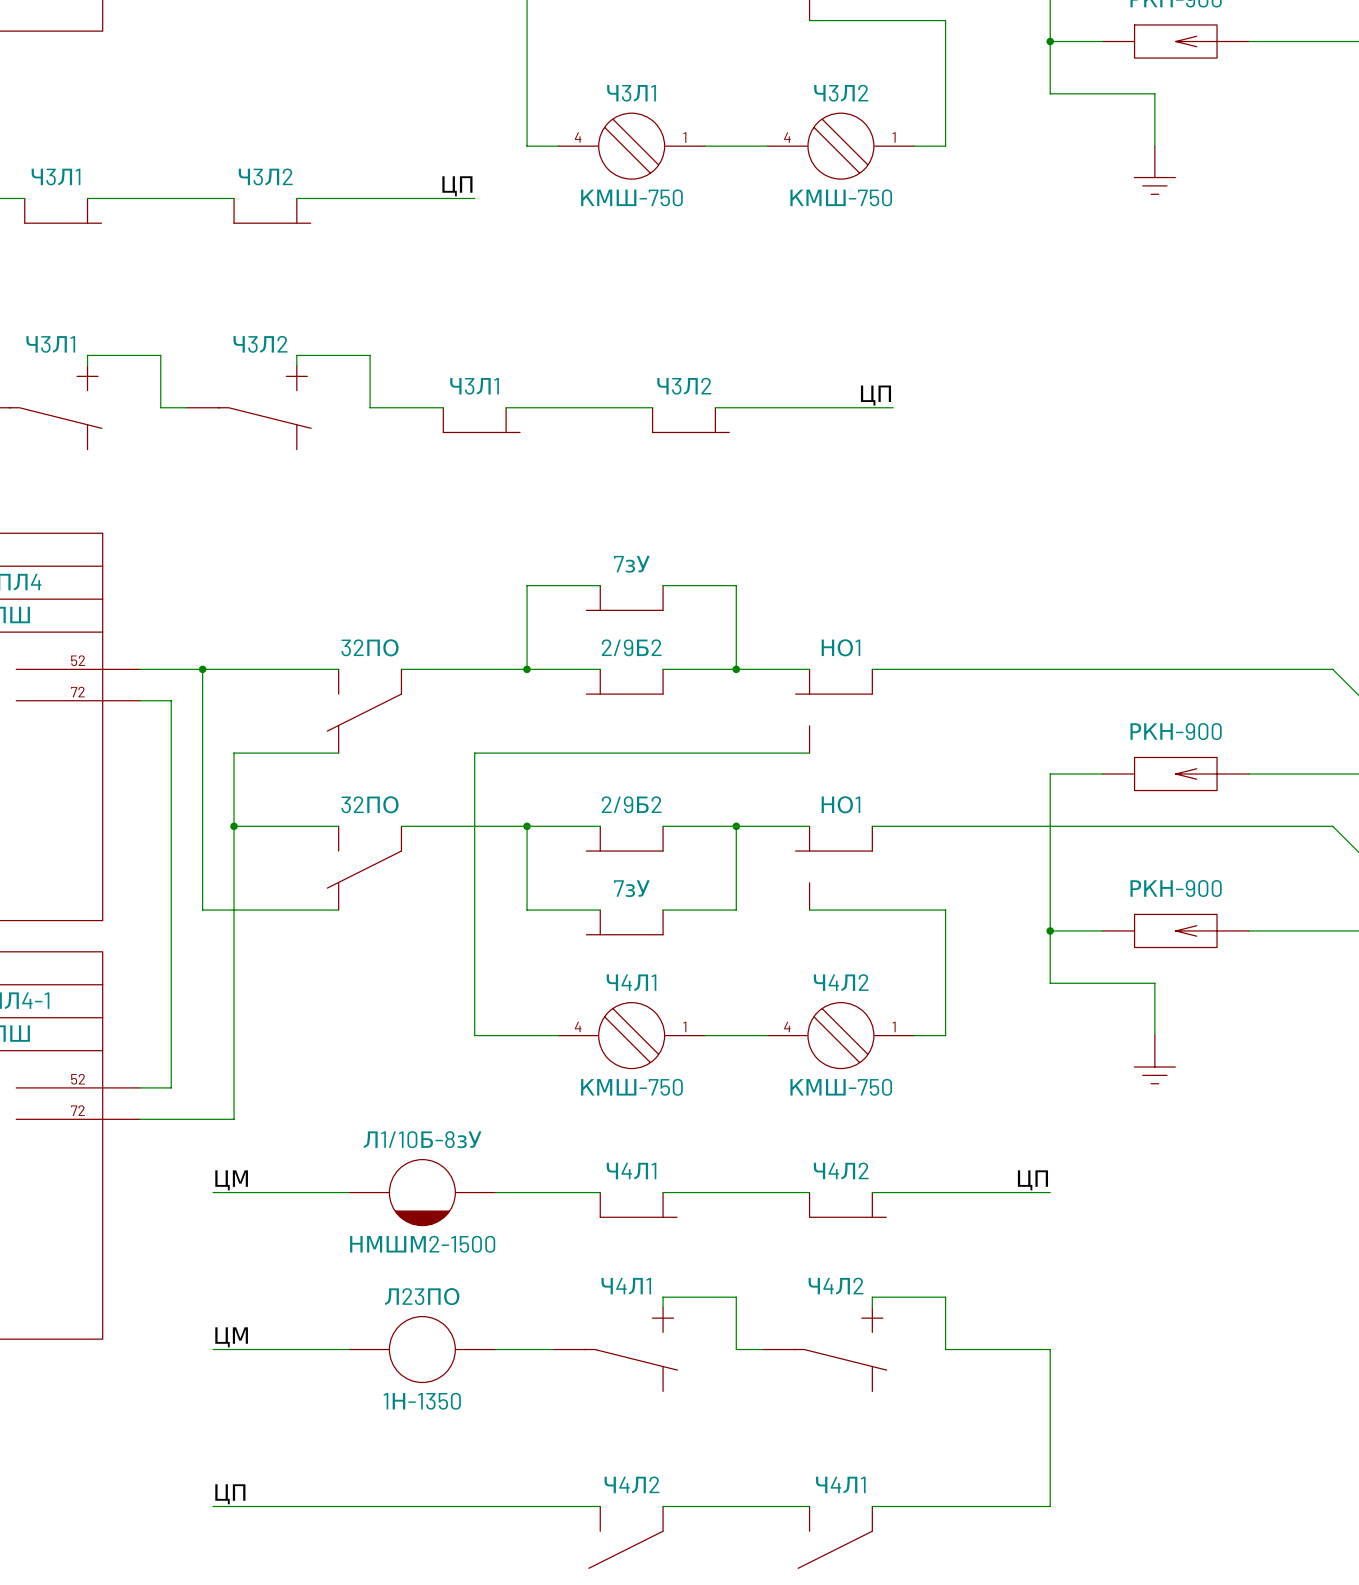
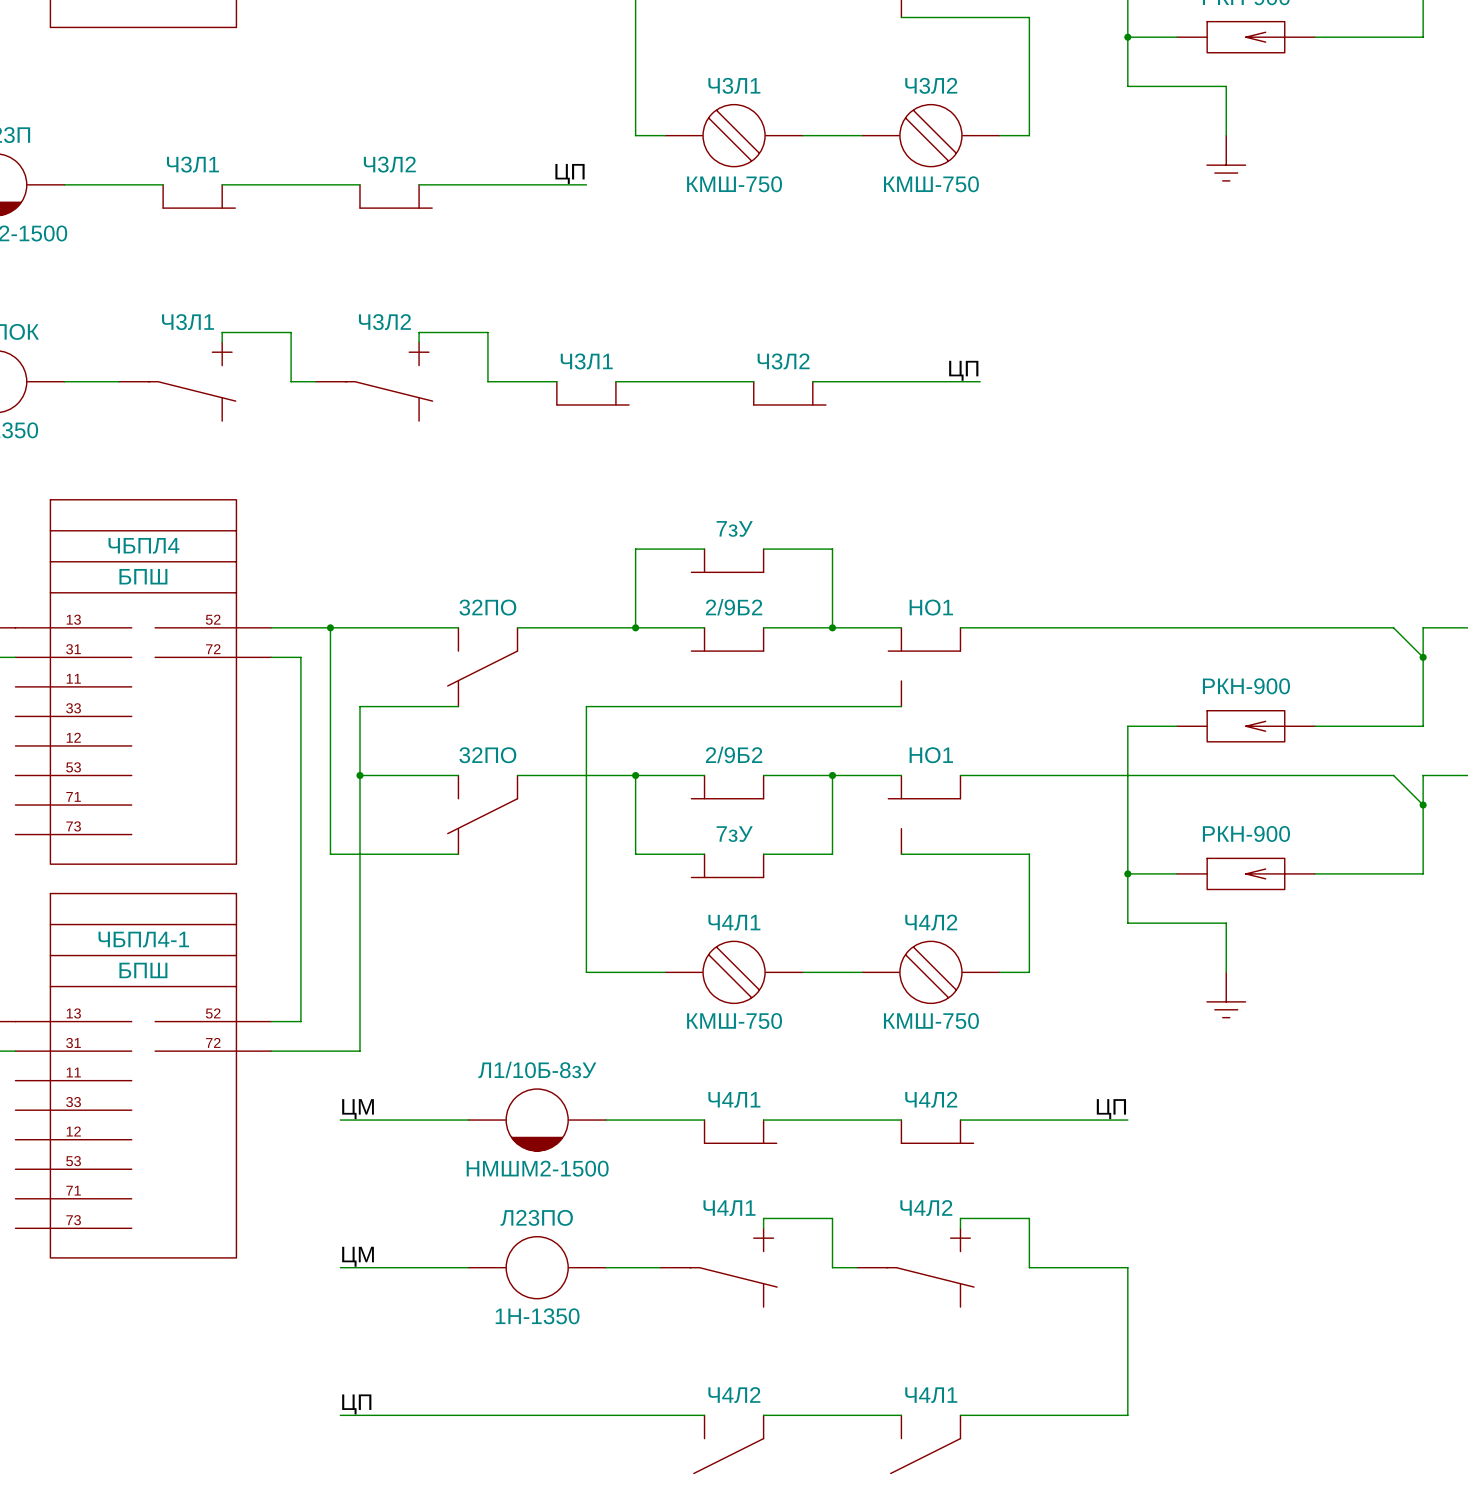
part pin number: 4 (578, 137) -> none
part pin number: 1 (684, 137) -> none
part pin number: 4 (787, 137) -> none
part pin number: 1 (894, 137) -> none
part pin number: 4 (578, 1026) -> none
part pin number: 1 (684, 1026) -> none
part pin number: 4 (787, 1026) -> none
part pin number: 1 (894, 1026) -> none

